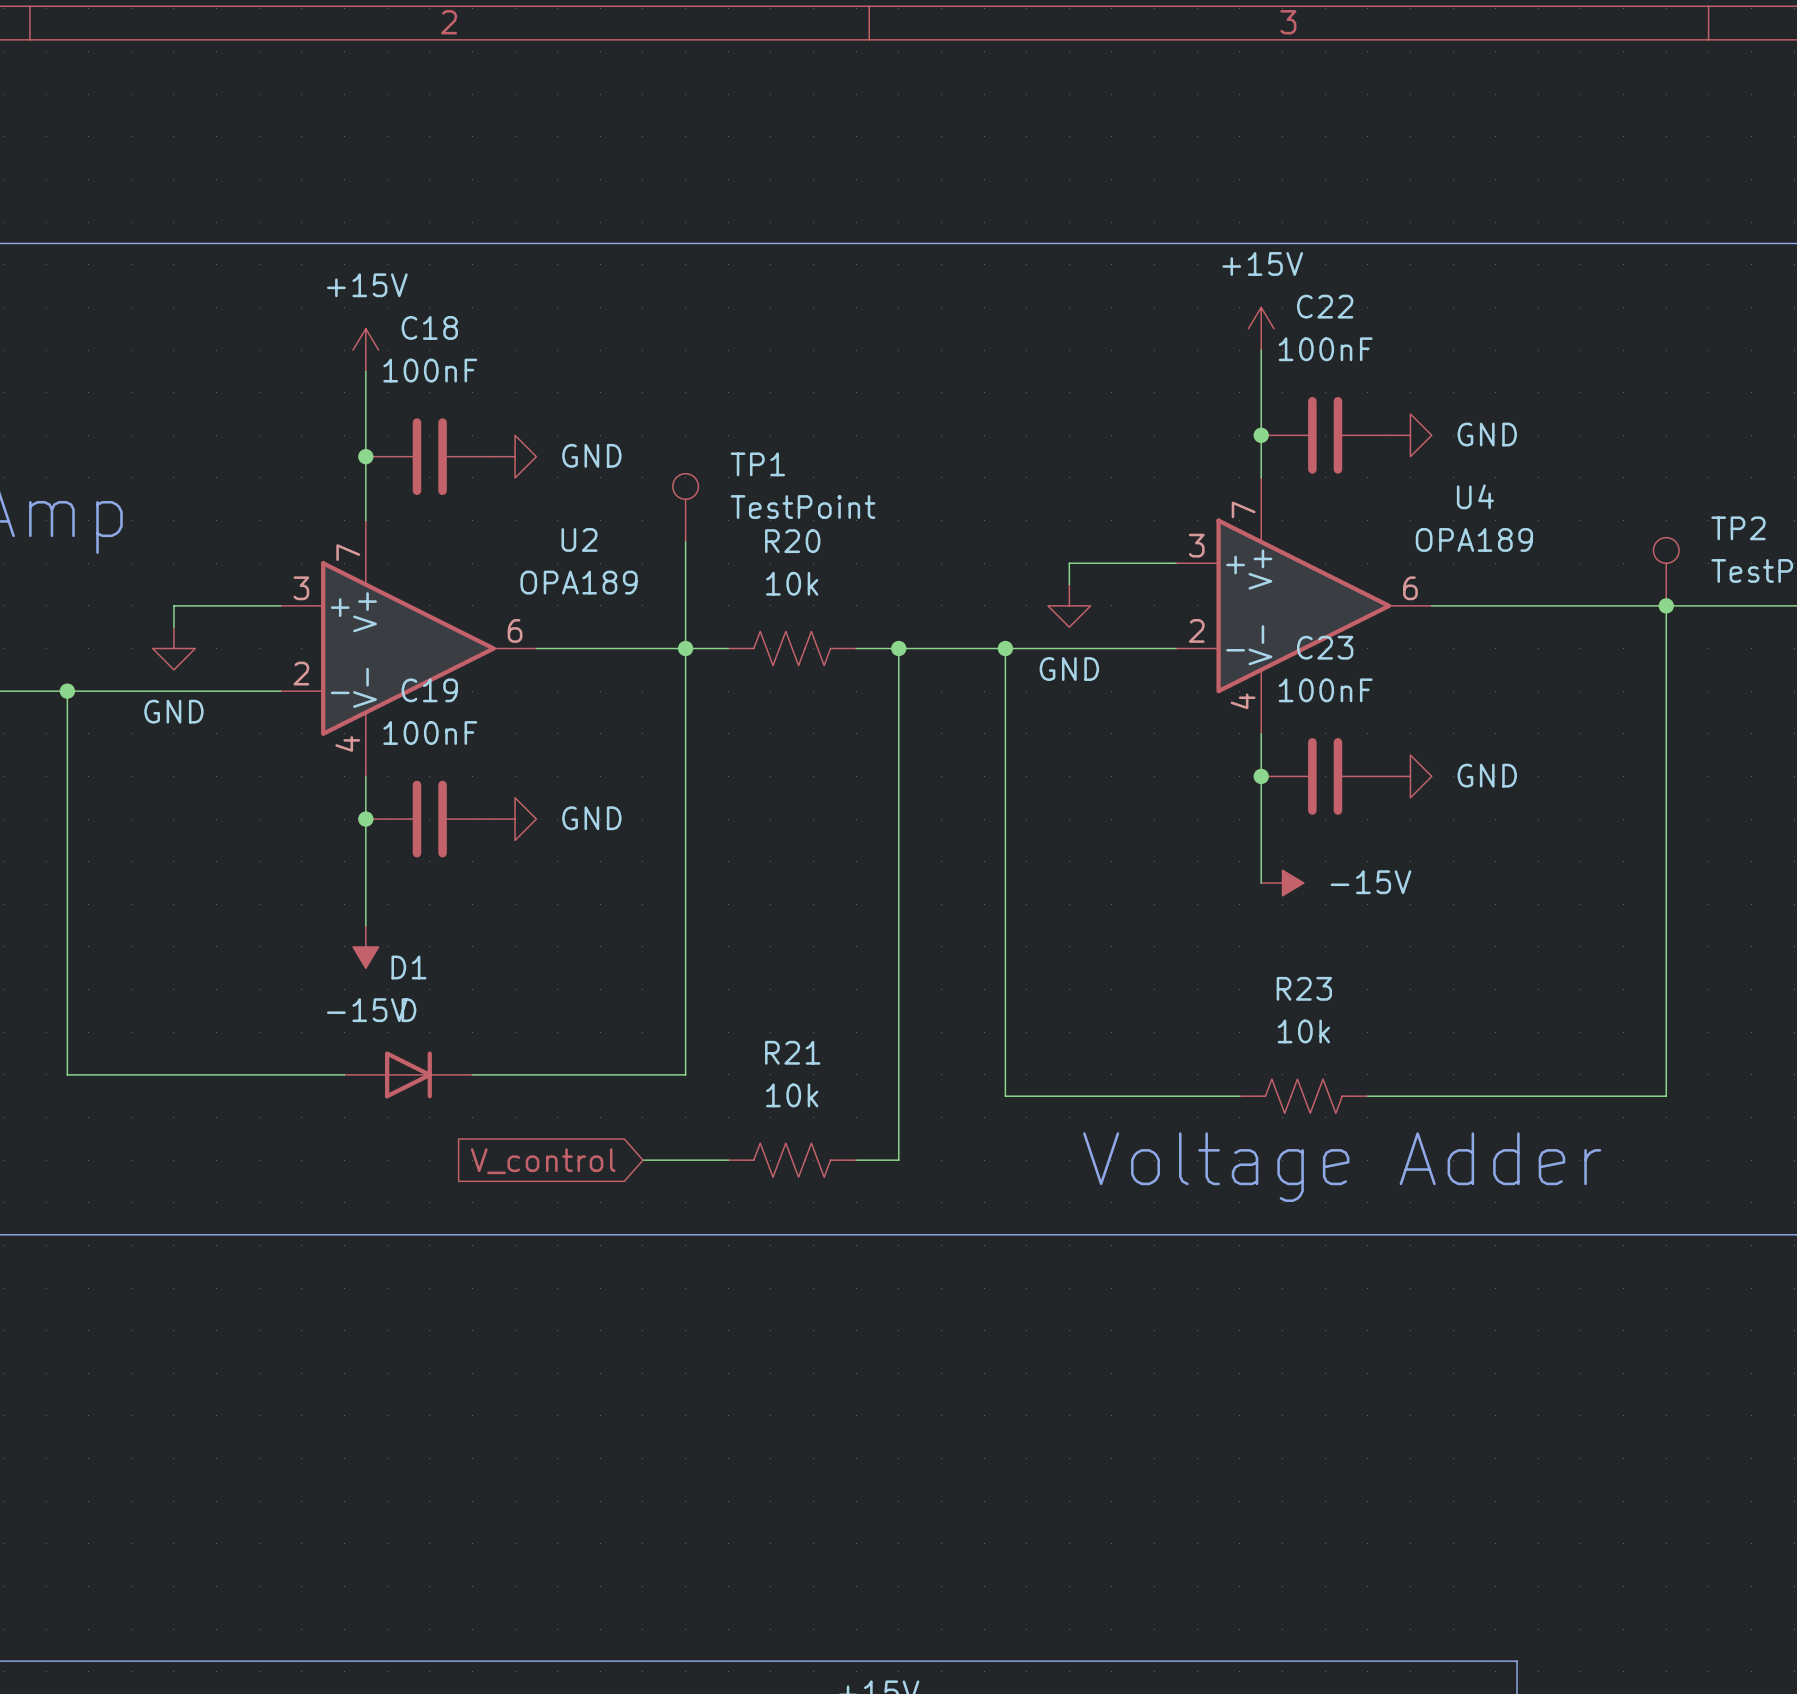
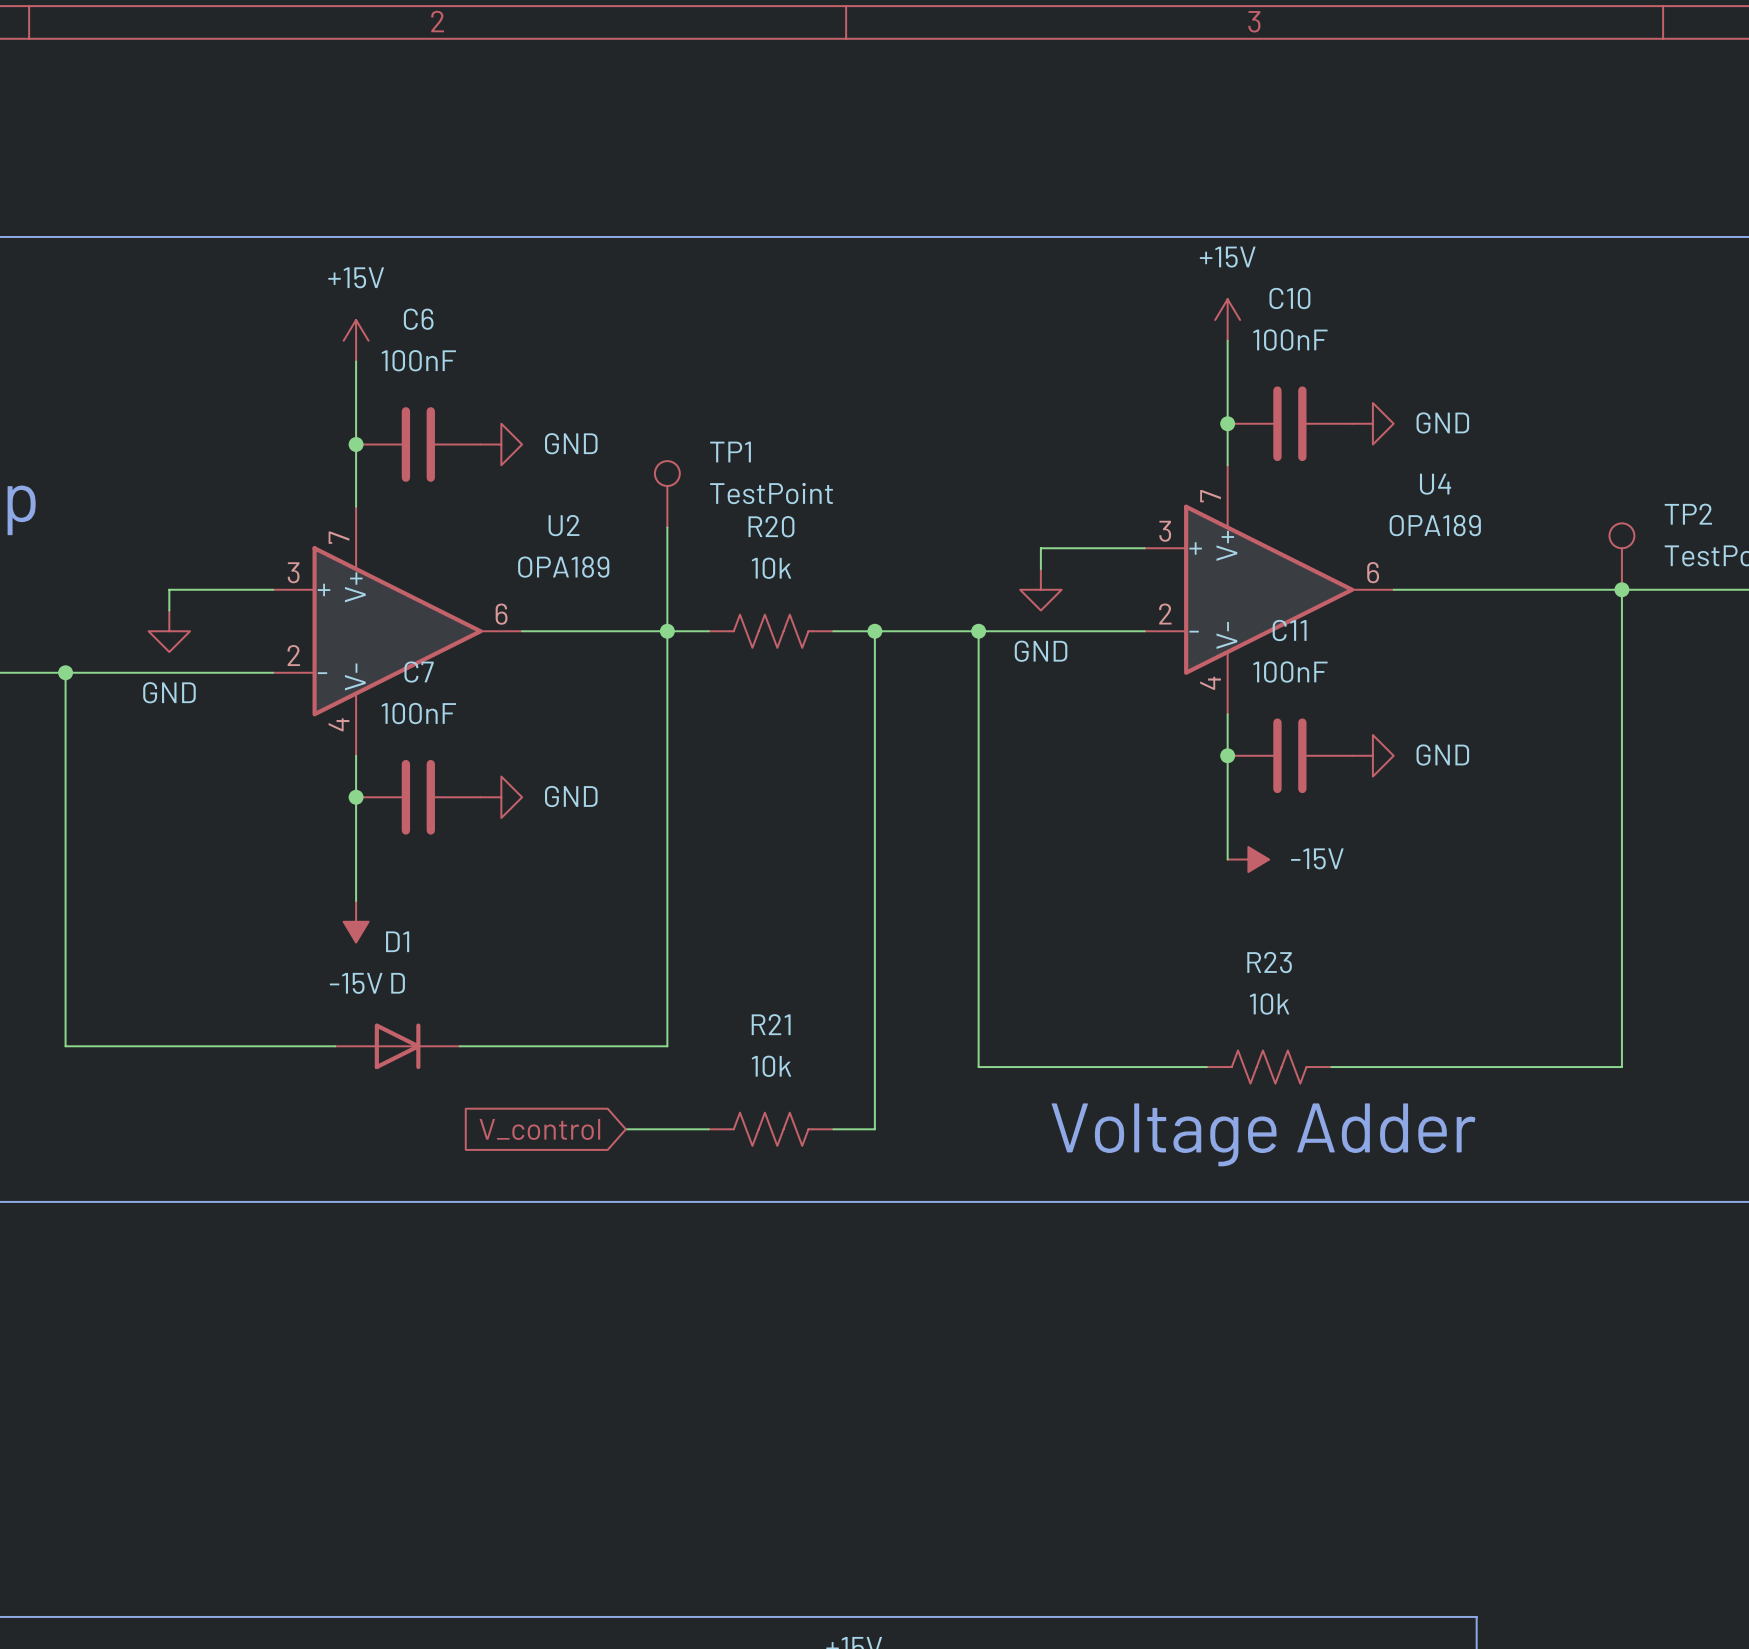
C22 name: C22 (1325, 306) -> C10 (1289, 298)
C18 name: C18 (429, 327) -> C6 (418, 319)
C23 name: C23 (1325, 647) -> C11 (1289, 630)
C19 name: C19 (429, 690) -> C7 (419, 672)

